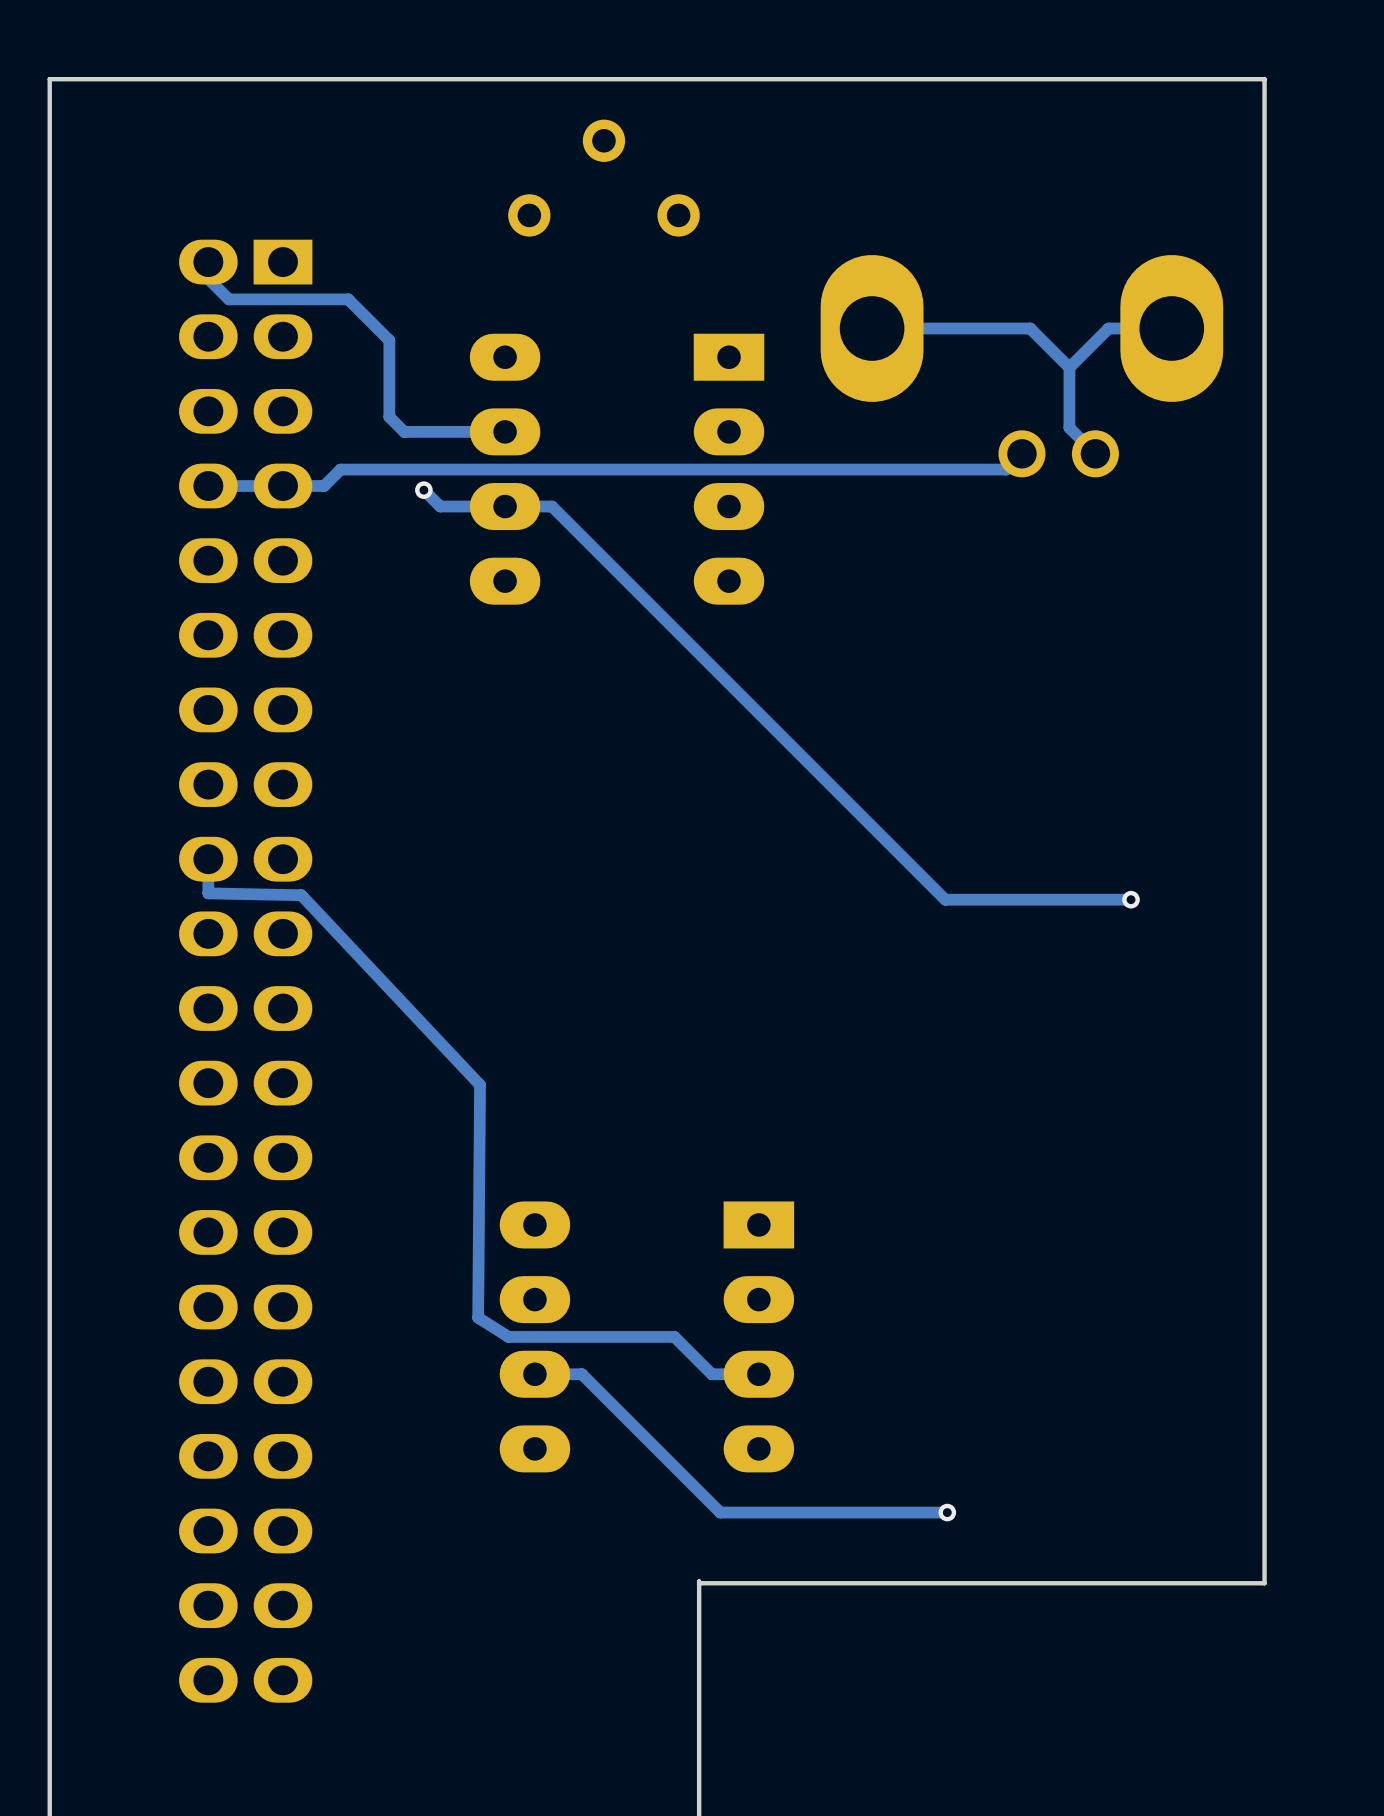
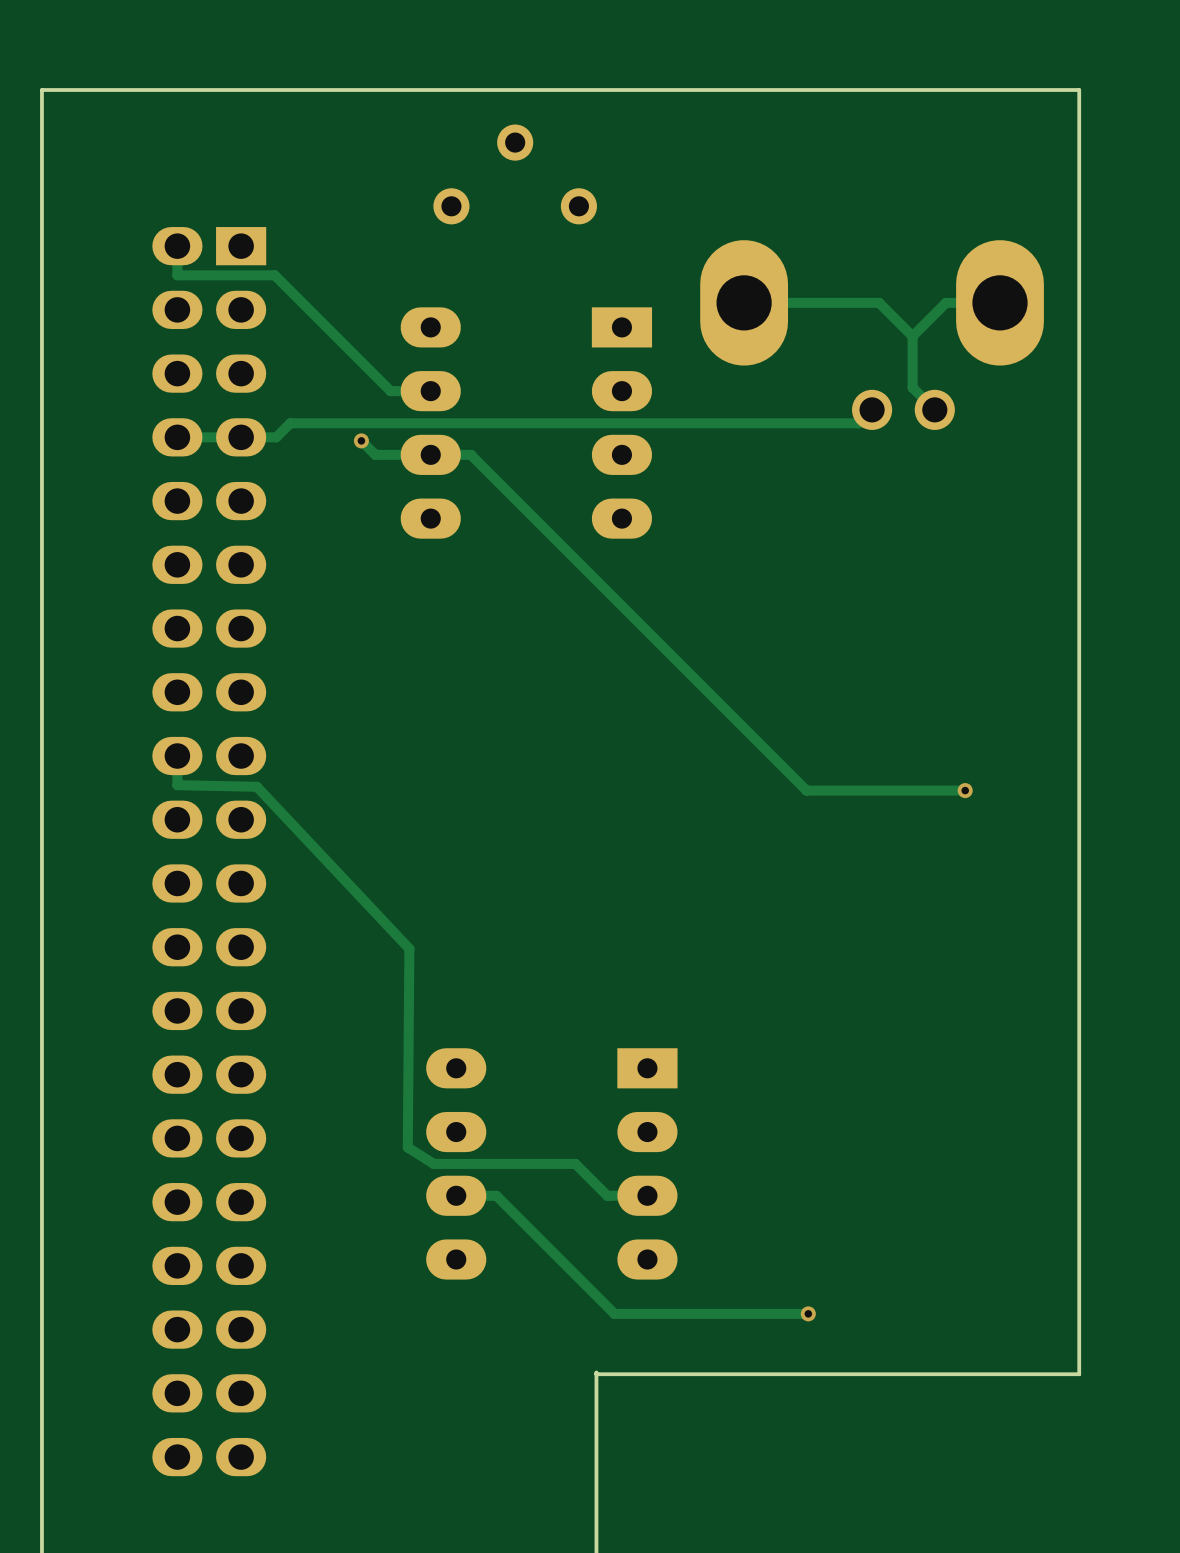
track: (208, 278) (228, 299) (348, 299) (389, 340) (389, 416) (404, 431) (458, 431) -> (177, 260) (177, 275) (274, 275) (390, 391)

